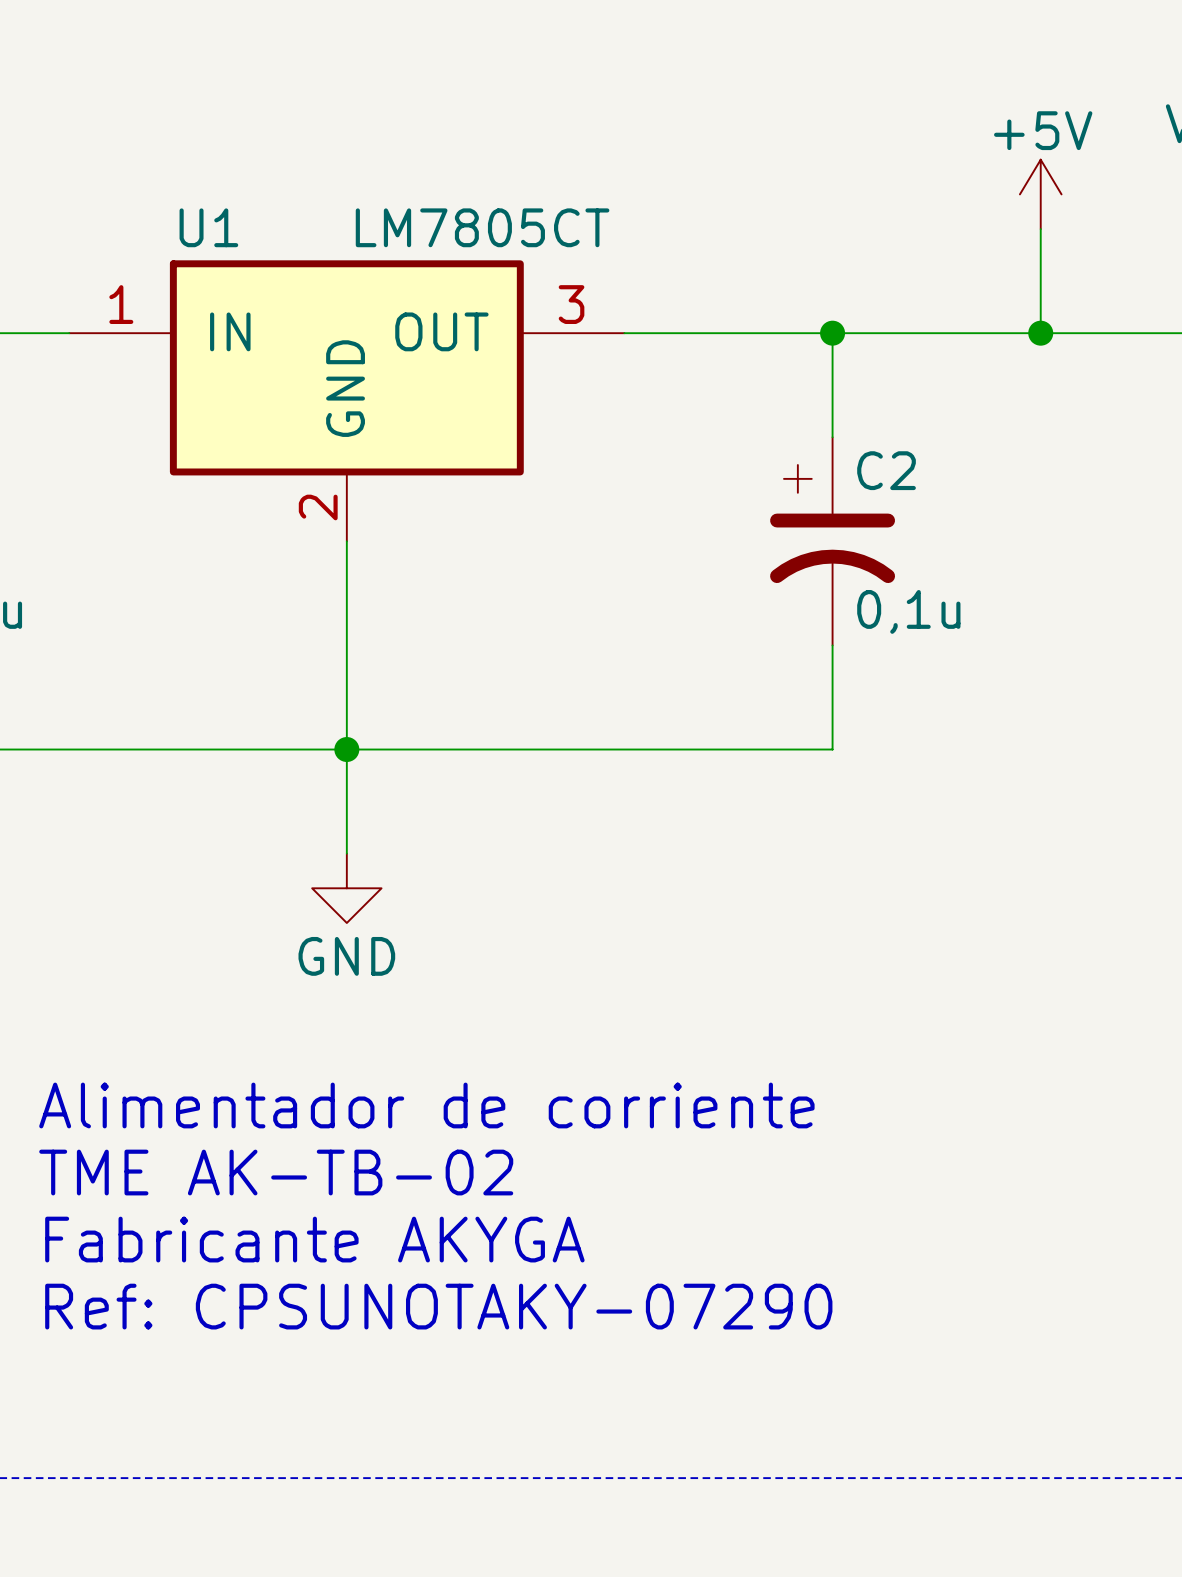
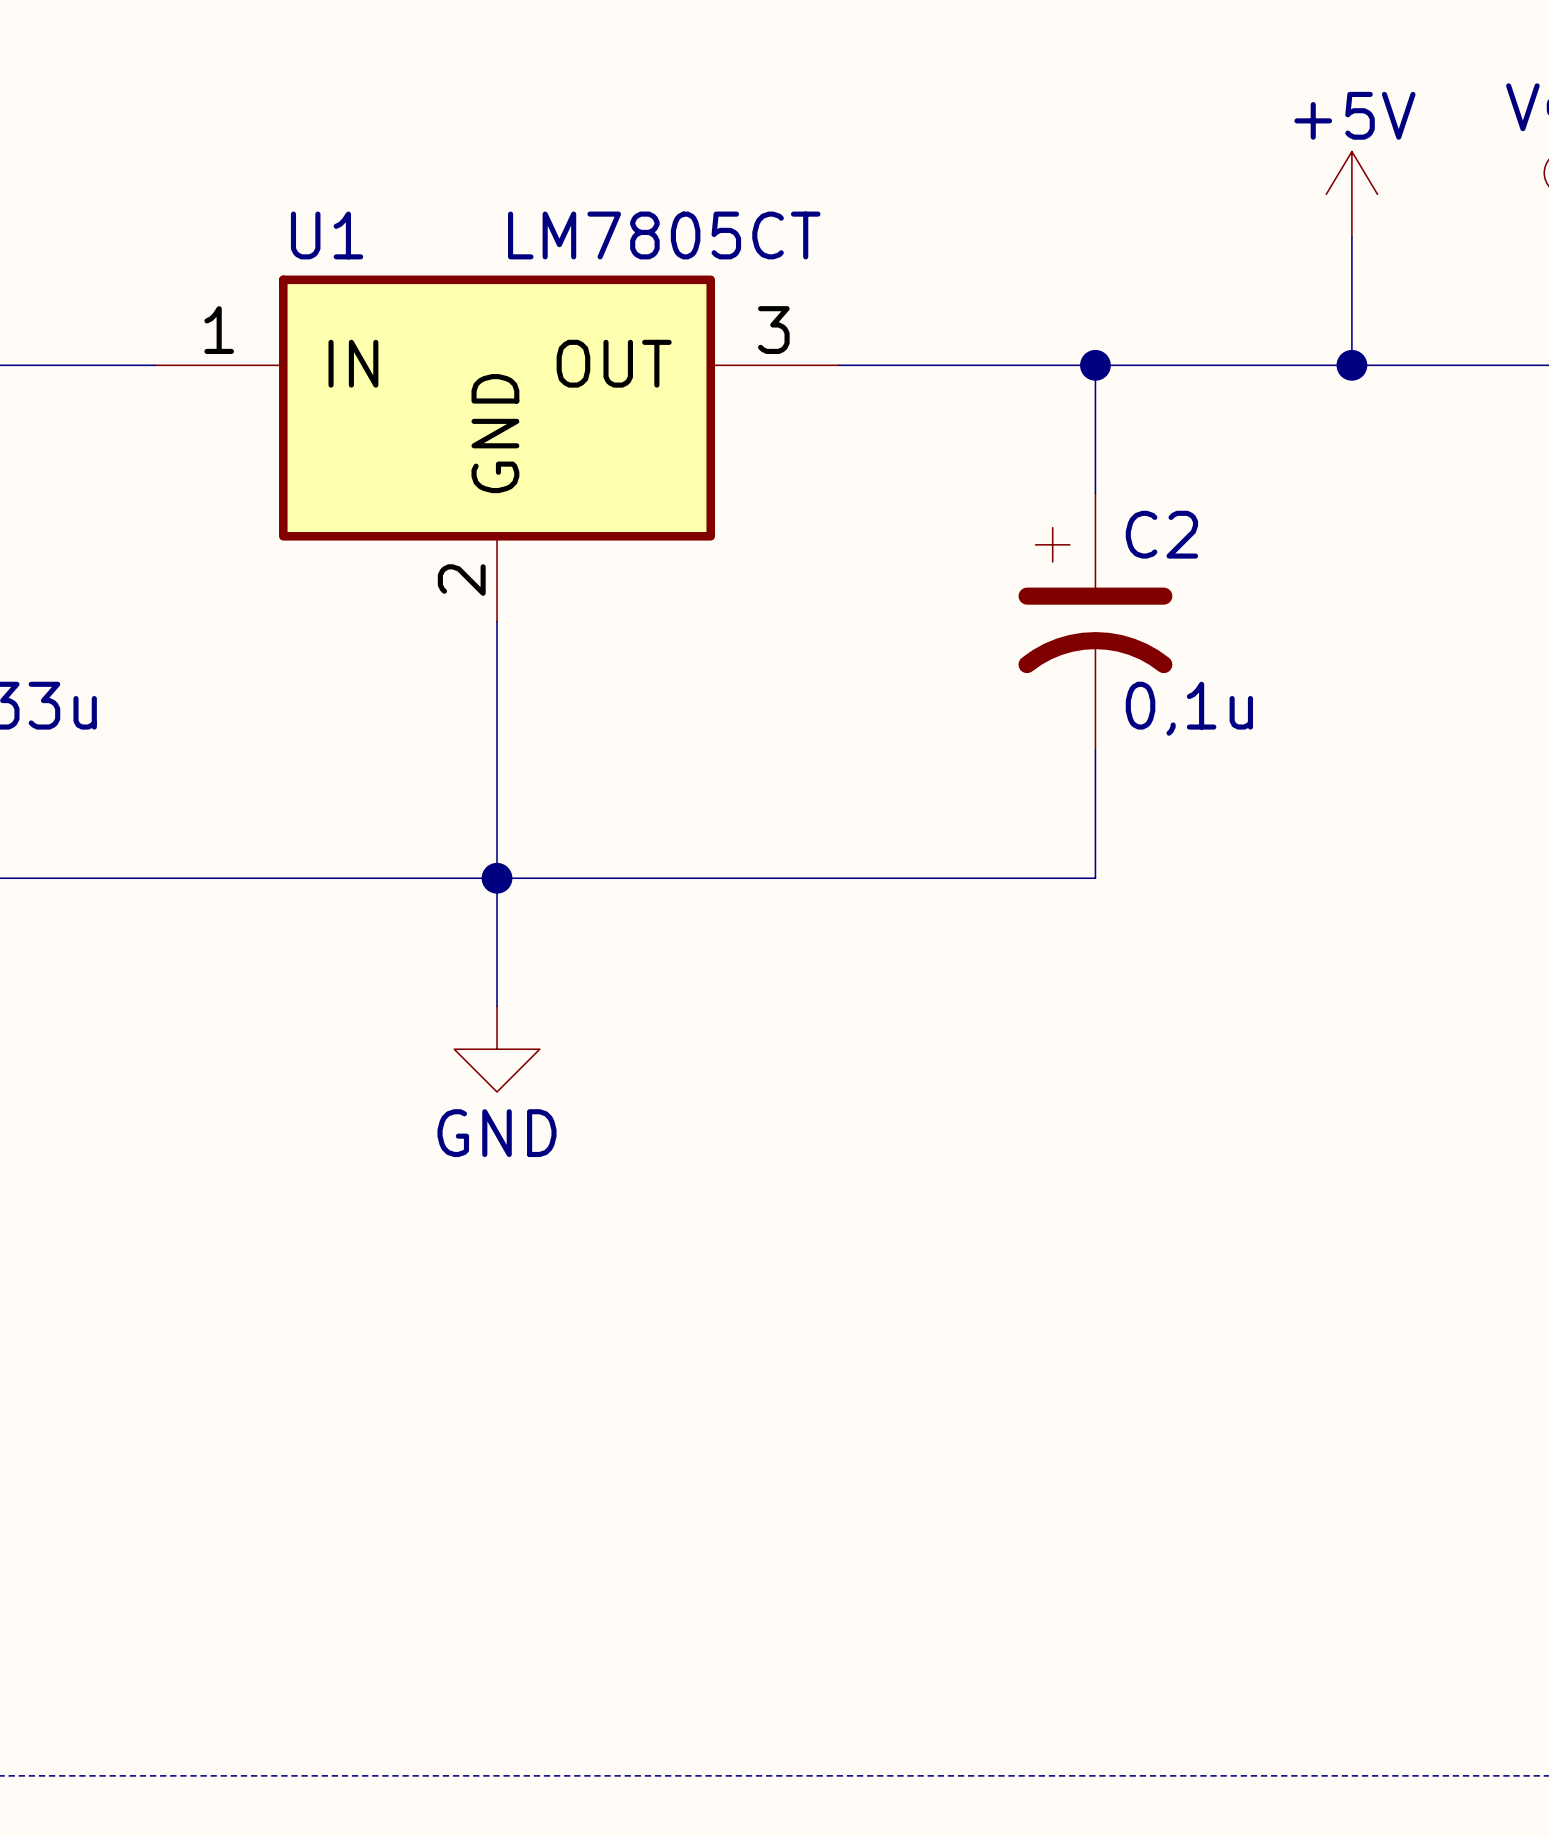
text: Alimentador de corriente (426, 1105) -> none
text: TME AK-TB-02 (276, 1172) -> none
text: Fabricante AKYGA (314, 1239) -> none
text: Ref: CPSUNOTAKY-07290 (438, 1306) -> none

